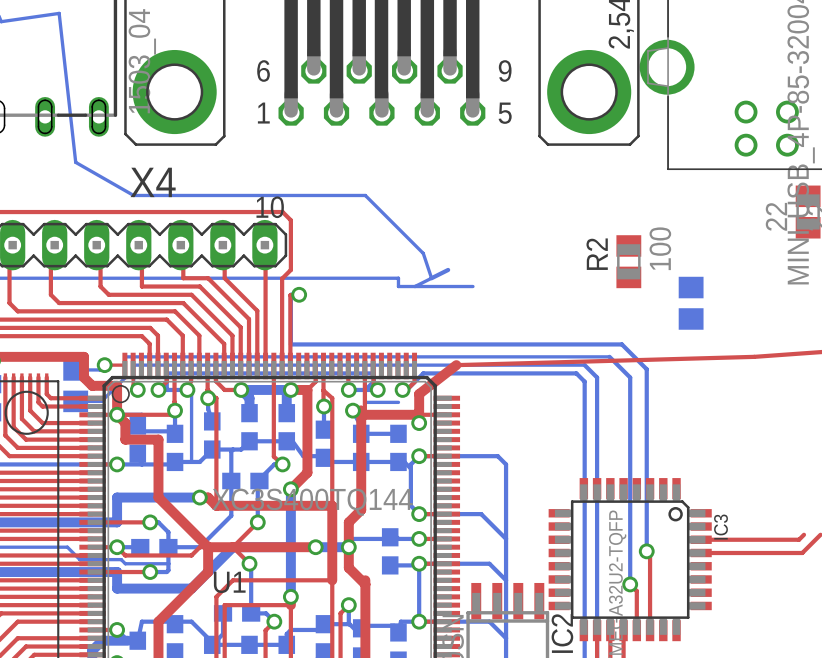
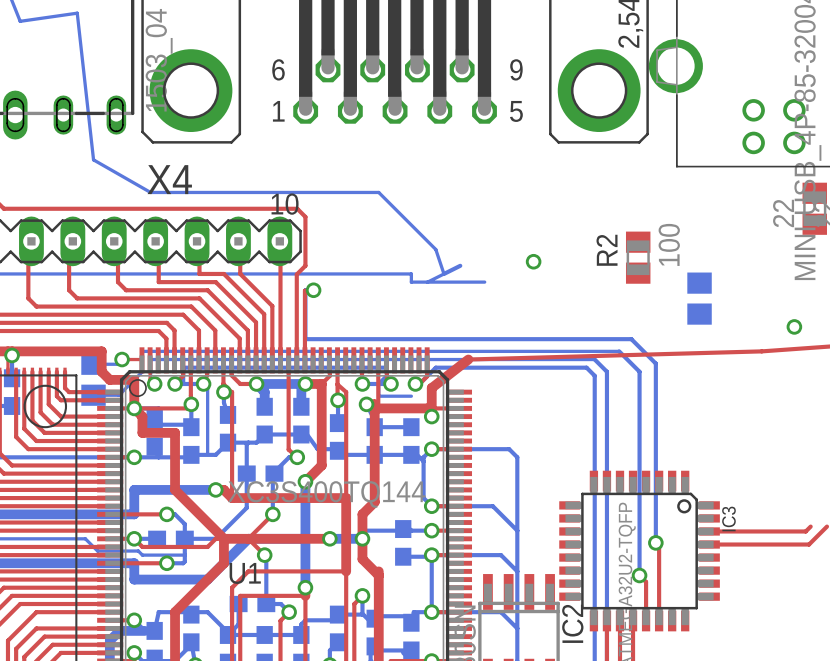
via: none -> (533, 261)
via: none -> (794, 326)

